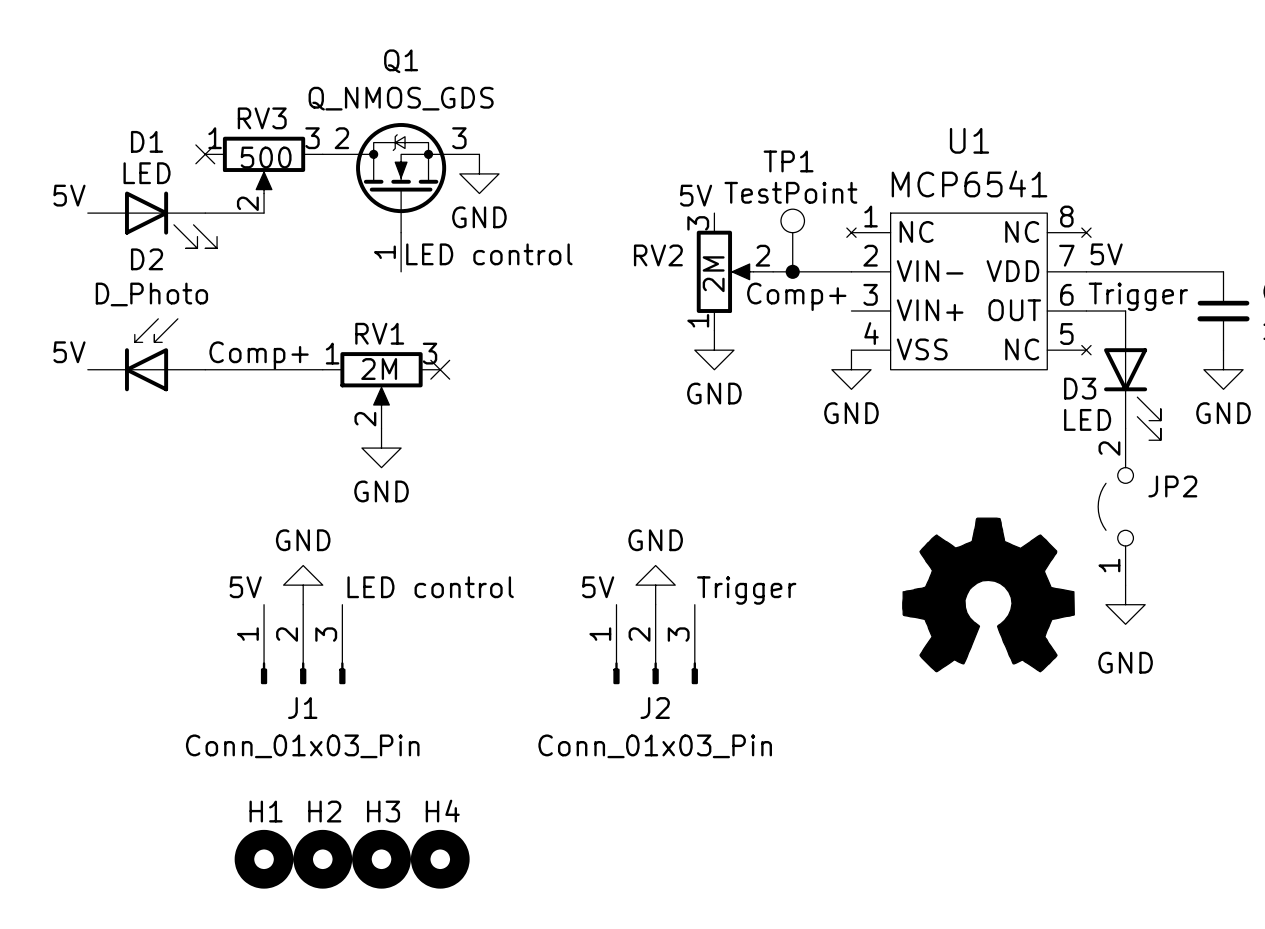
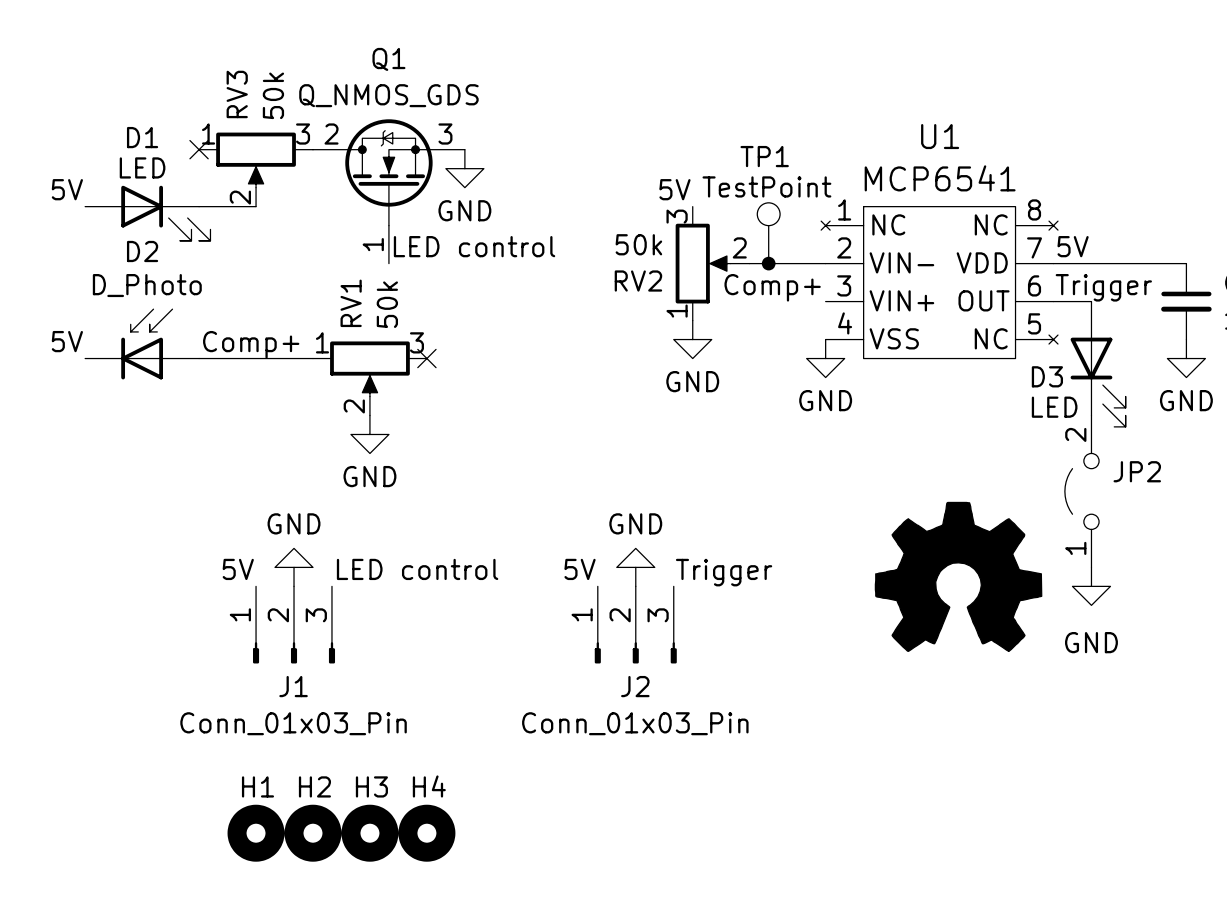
RV3 name rotation: 0° (262, 118) -> 90° counterclockwise (237, 94)
RV3 value: 500 (266, 157) -> 50k (273, 95)
RV2 name position: RV2 (658, 255) -> RV2 (638, 281)
RV2 value: 2M (713, 274) -> 50k (638, 244)
RV1 name rotation: 0° (379, 333) -> 90° counterclockwise (351, 303)
RV1 value: 2M (379, 369) -> 50k (387, 304)

